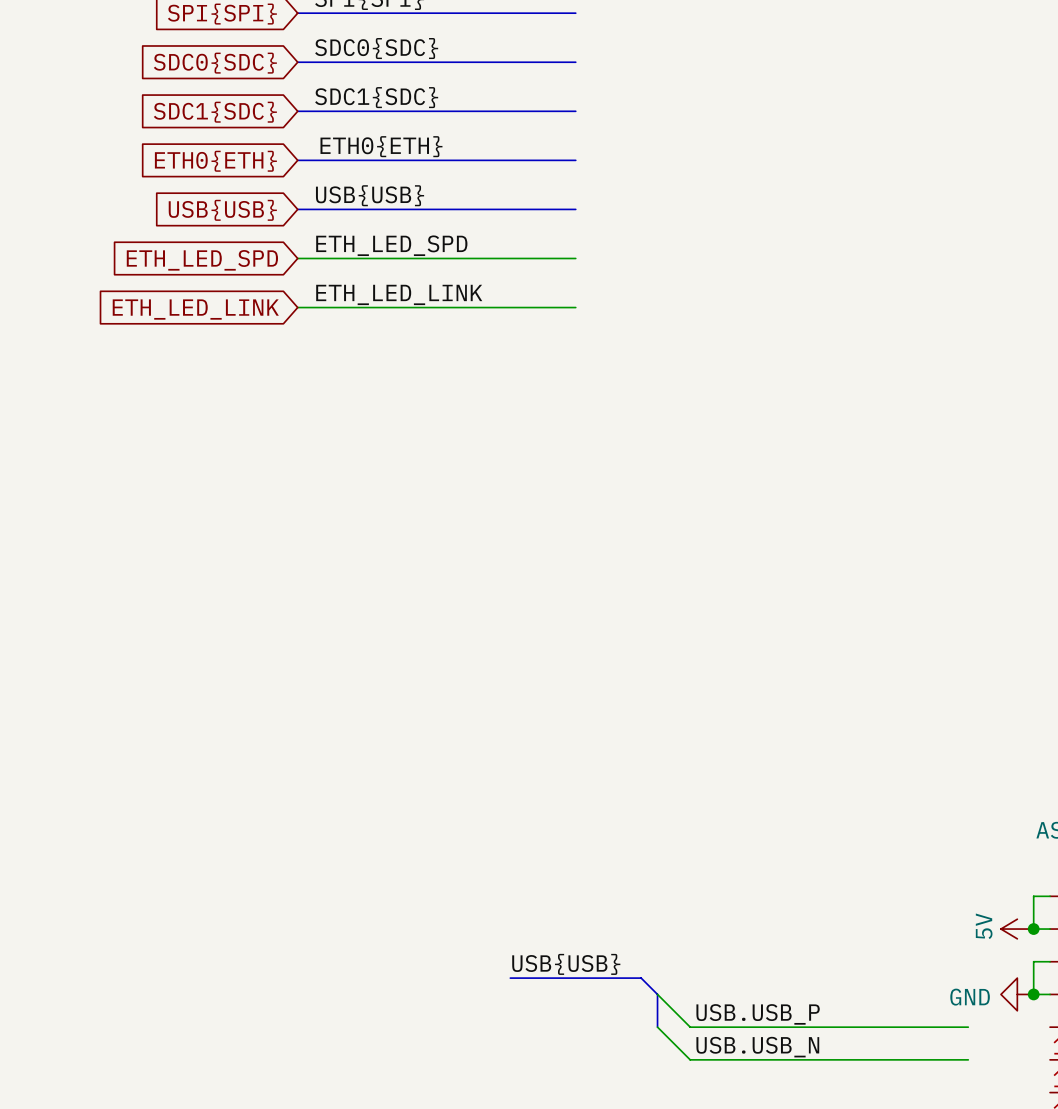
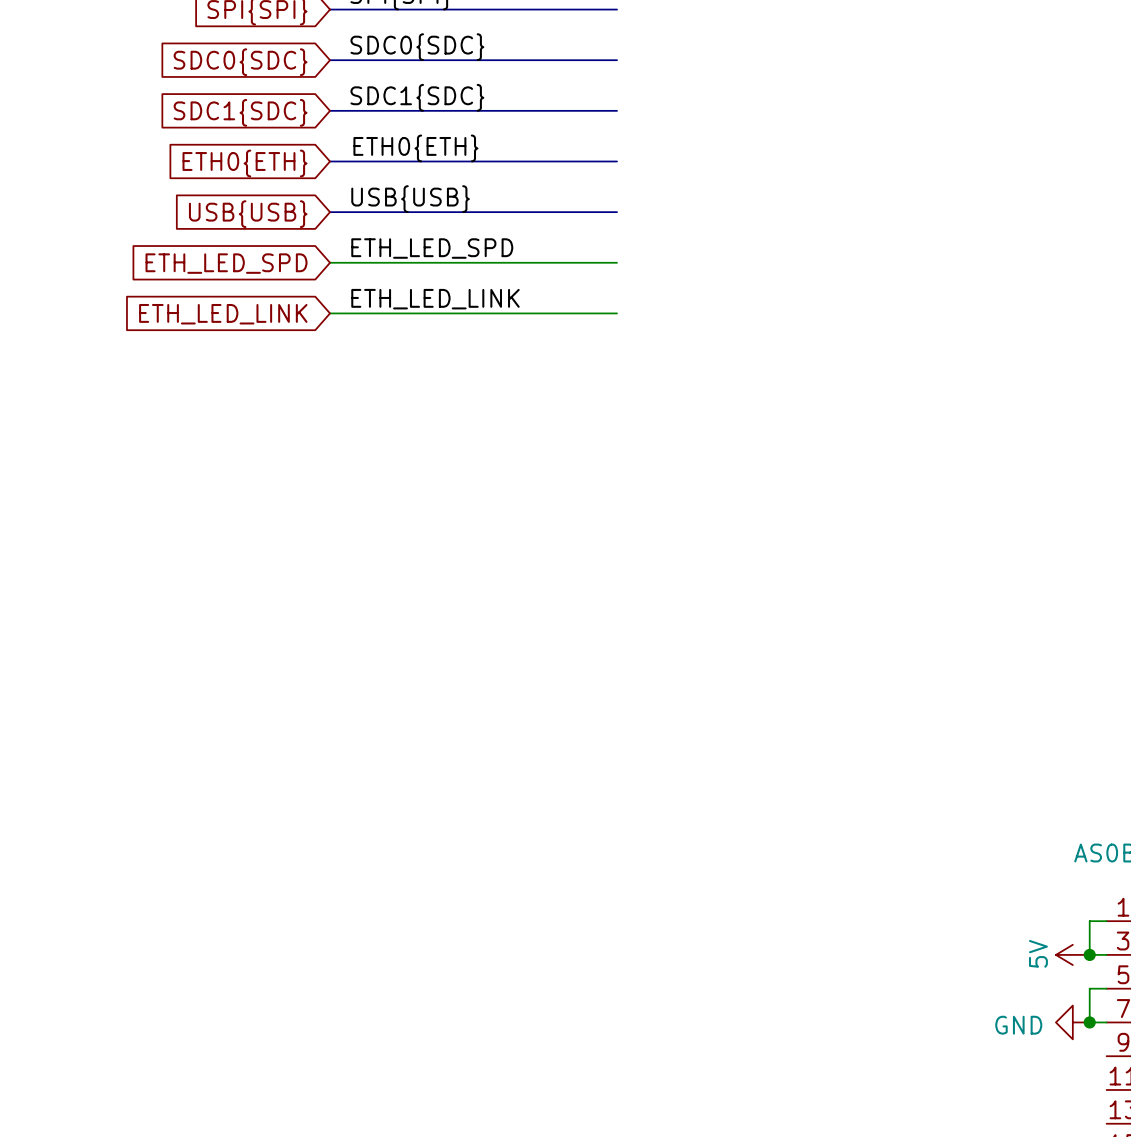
label: USB{USB} (566, 964) -> none
bus: (510, 978) (641, 978) (657, 994) (657, 1027) -> none
wire: (657, 994) (690, 1027) (968, 1027) -> none
label: USB.USB_P (758, 1014) -> none
wire: (657, 1027) (690, 1059) (968, 1059) -> none
label: USB.USB_N (757, 1047) -> none

